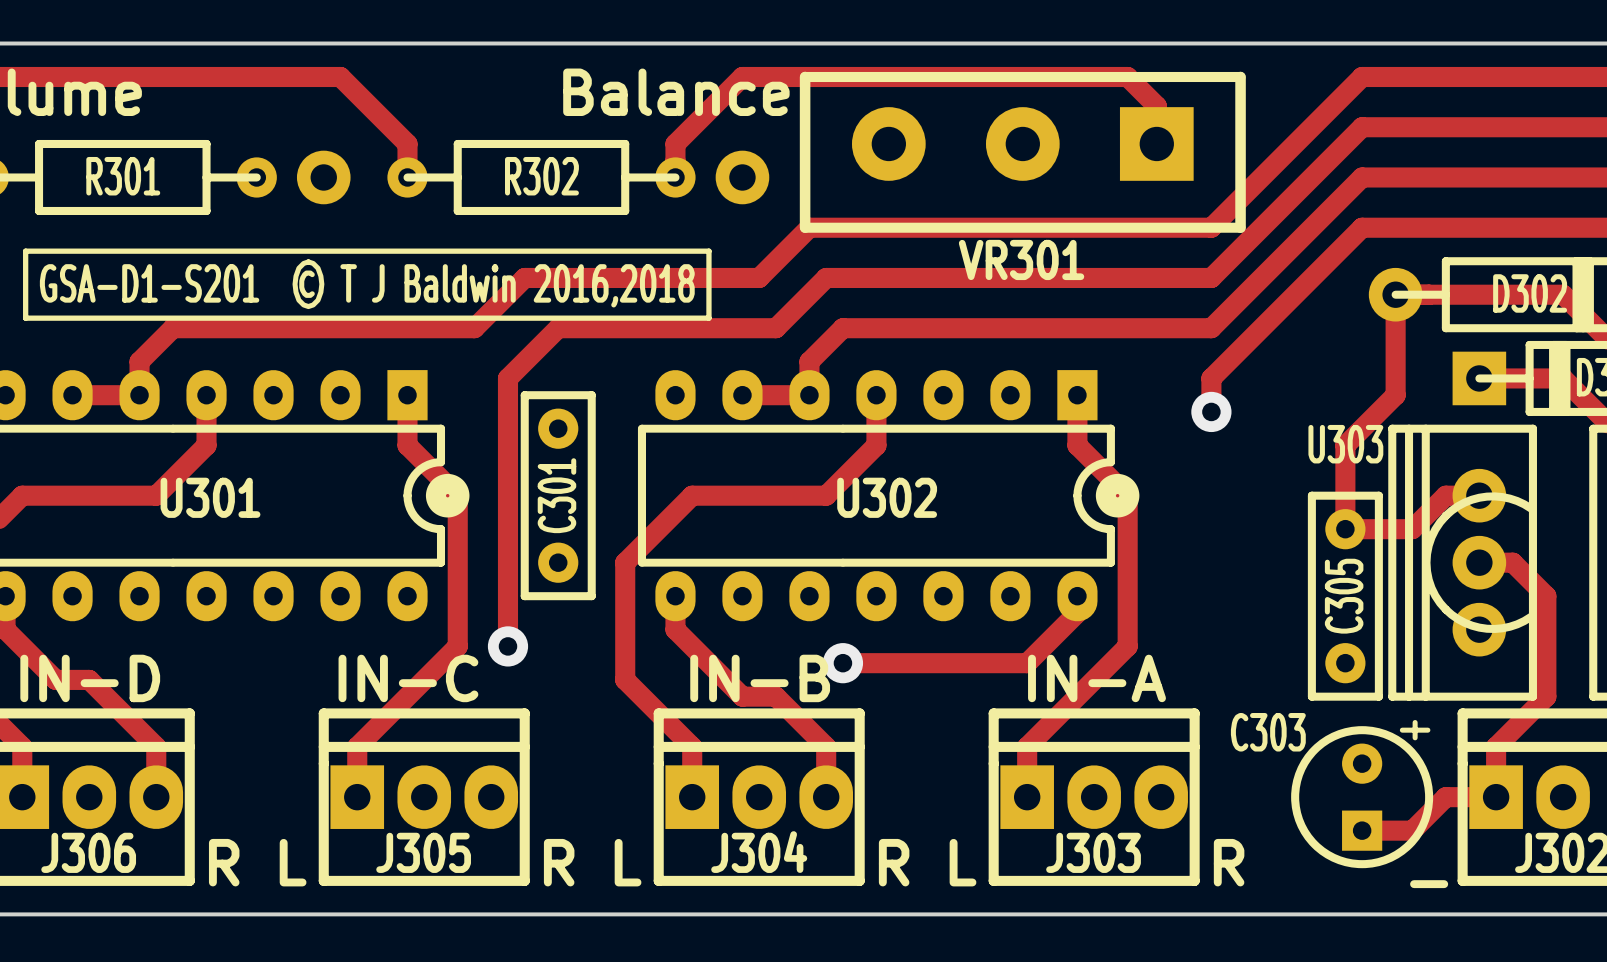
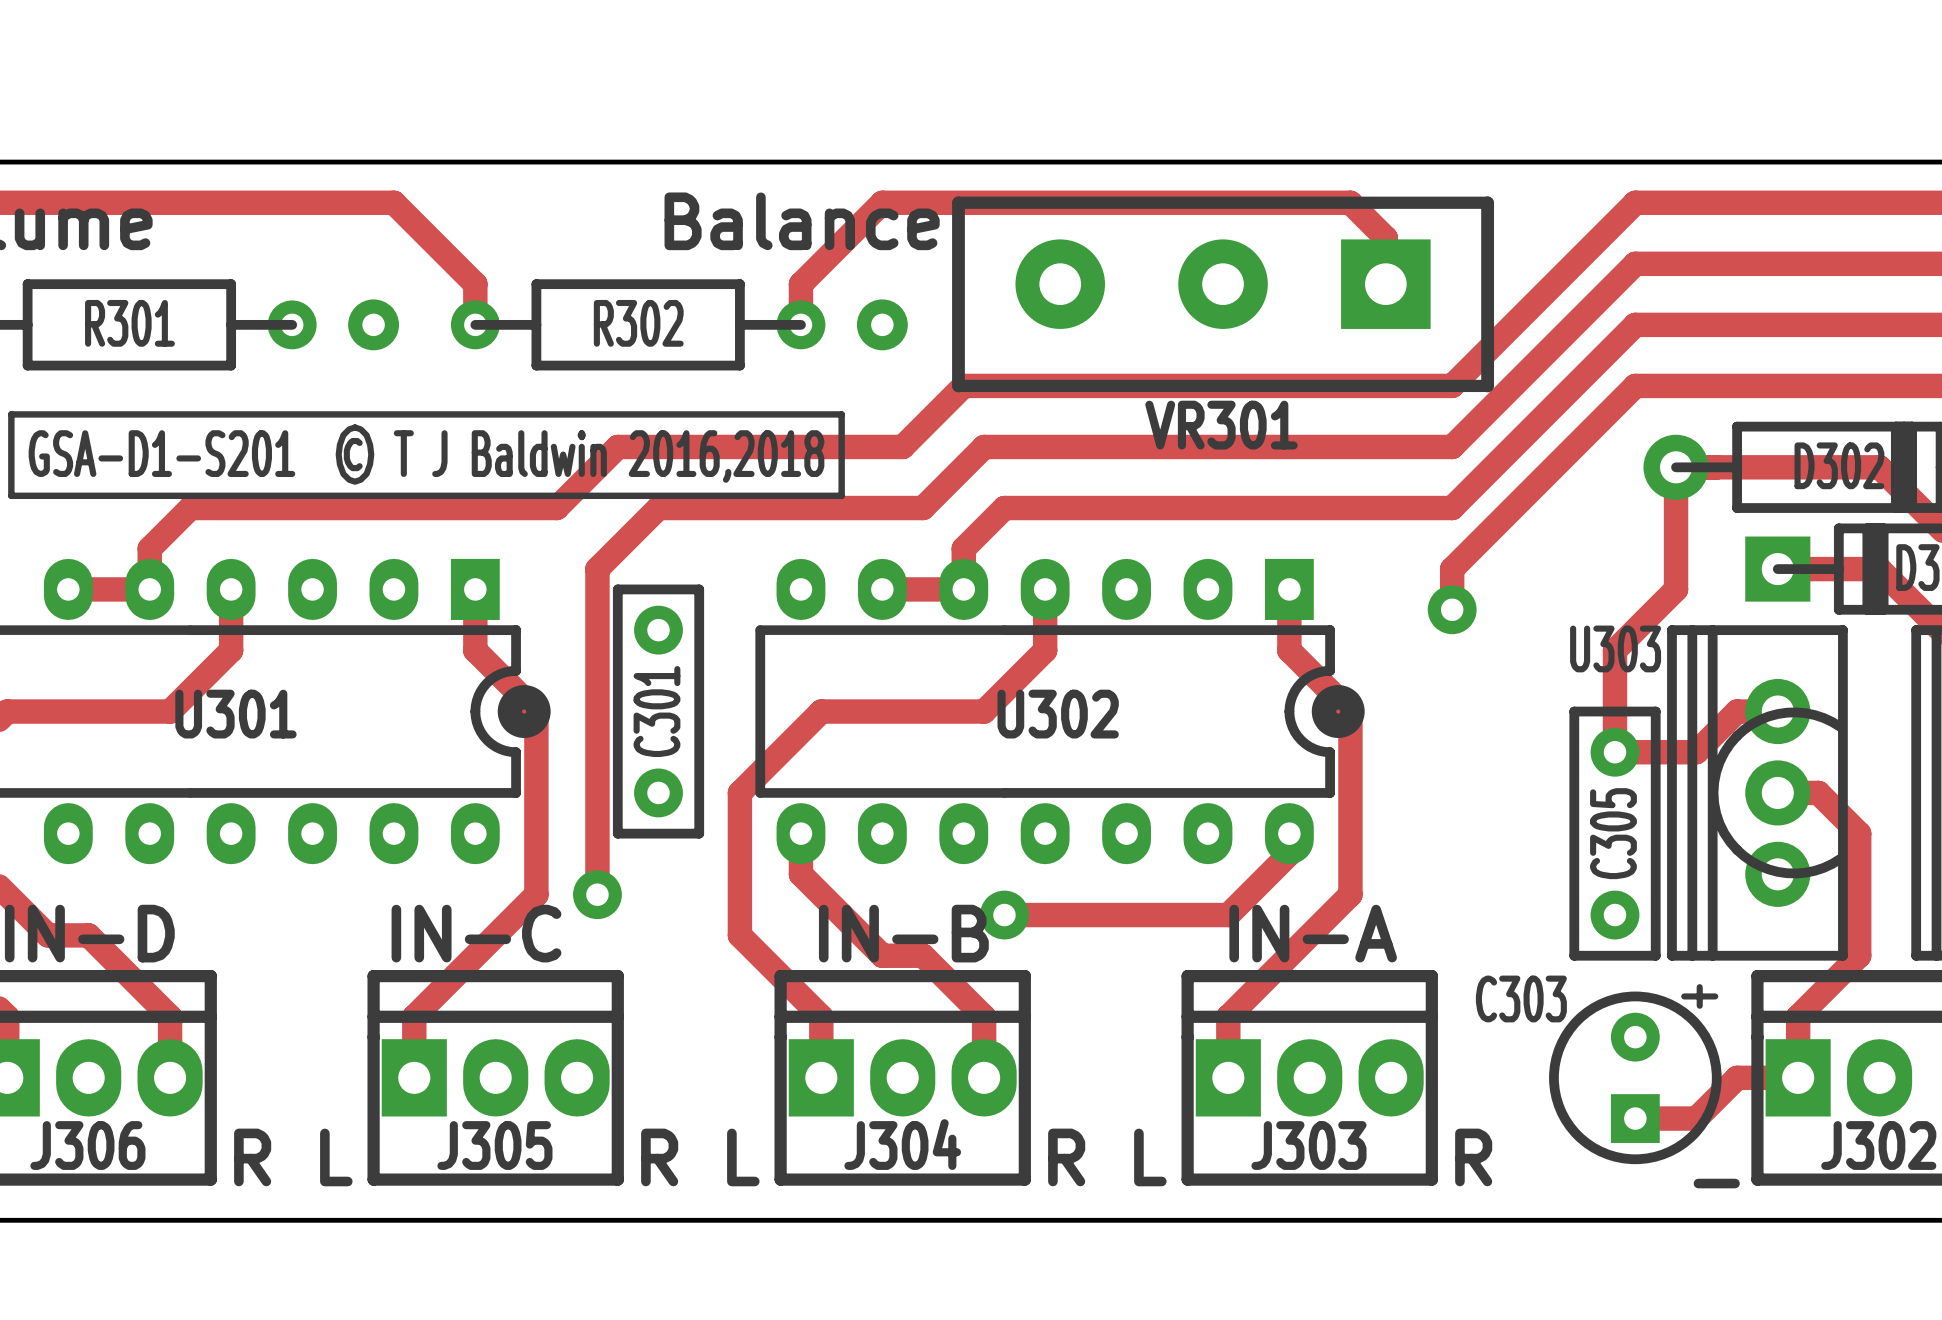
part footprint: [296, 150, 351, 205] -> [348, 299, 400, 351]
part footprint: [715, 150, 770, 205] -> [856, 299, 908, 351]

